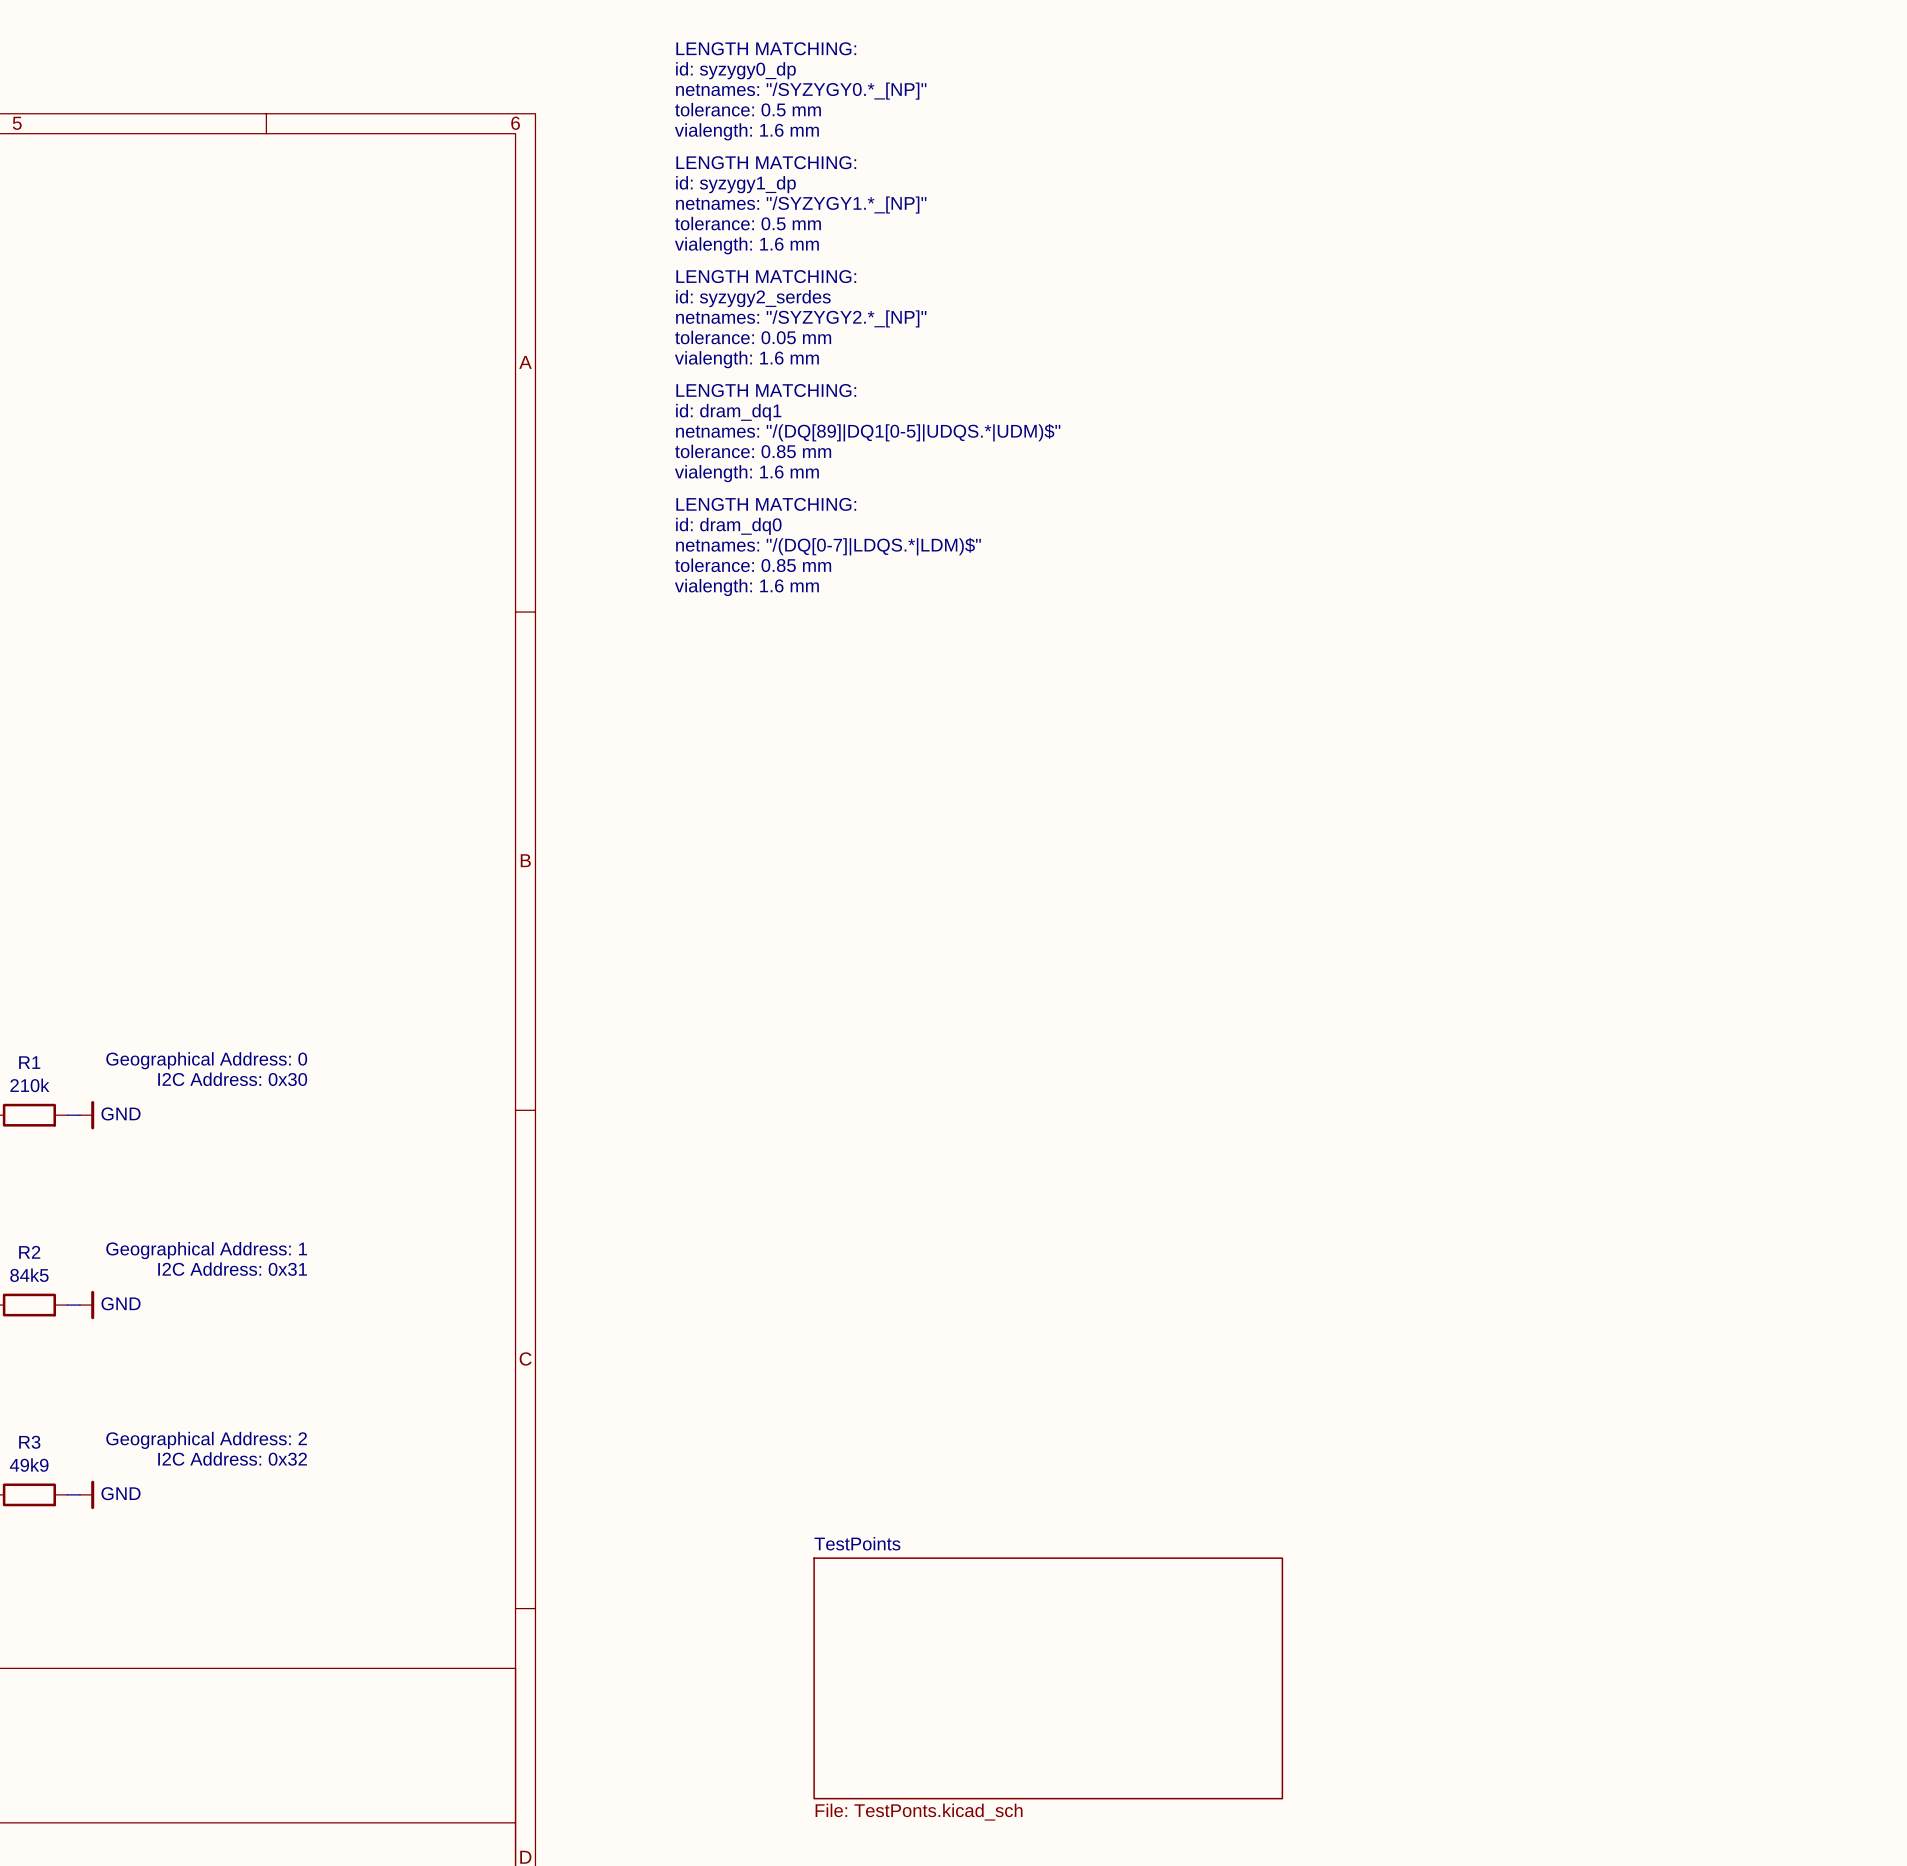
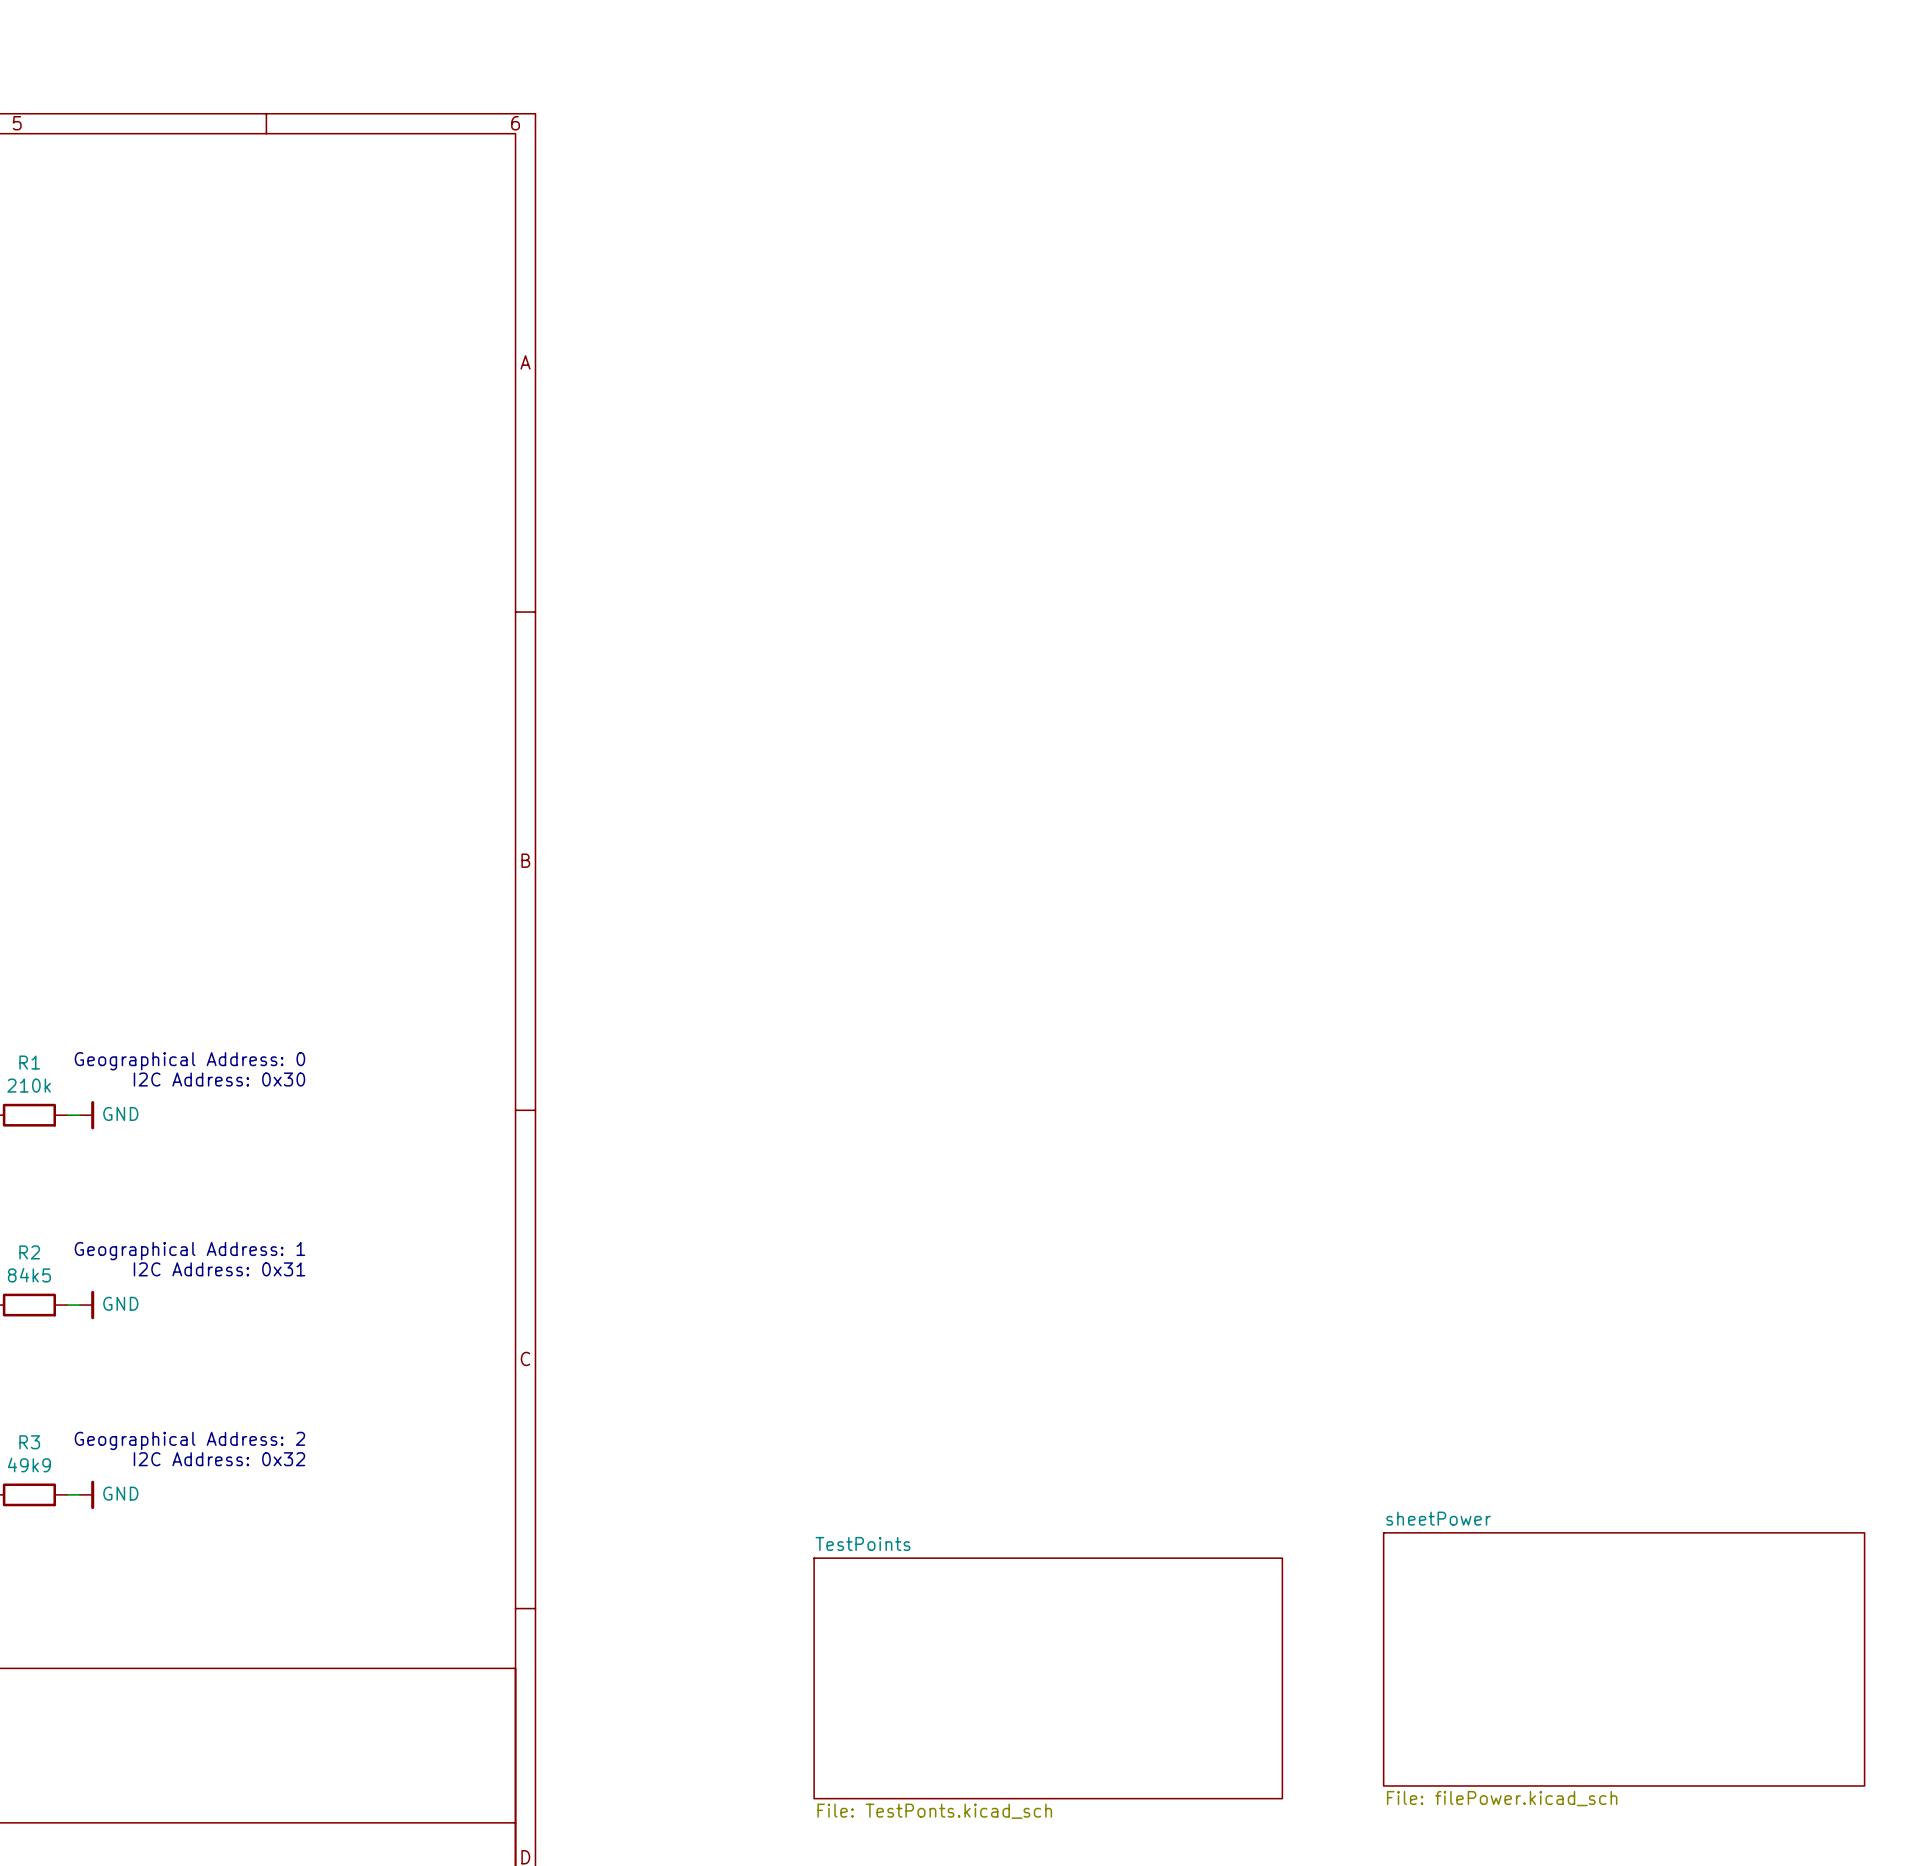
text: LENGTH MATCHING: (766, 48) -> none
text: id: syzygy0_dp (735, 70) -> none
text: netnames: "/SYZYGY0.*_[NP]" (801, 91) -> none
text: tolerance: 0.5 mm (748, 109) -> none
text: vialength: 1.6 mm (746, 131) -> none
text: LENGTH MATCHING: (766, 162) -> none
text: id: syzygy1_dp (735, 184) -> none
text: netnames: "/SYZYGY1.*_[NP]" (801, 205) -> none
text: tolerance: 0.5 mm (748, 223) -> none
text: vialength: 1.6 mm (746, 245) -> none
text: LENGTH MATCHING: (766, 276) -> none
text: id: syzygy2_serdes (753, 298) -> none
text: netnames: "/SYZYGY2.*_[NP]" (801, 318) -> none
text: tolerance: 0.05 mm (753, 337) -> none
text: vialength: 1.6 mm (746, 359) -> none
text: LENGTH MATCHING: (766, 390) -> none
text: id: dram_dq1 (728, 412) -> none
text: netnames: "/(DQ[89]|DQ1[0-5]|UDQS.*|UDM)$" (868, 432) -> none
text: tolerance: 0.85 mm (753, 451) -> none
text: vialength: 1.6 mm (746, 473) -> none
text: LENGTH MATCHING: (766, 504) -> none
text: id: dram_dq0 (728, 526) -> none
text: netnames: "/(DQ[0-7]|LDQS.*|LDM)$" (828, 546) -> none
text: tolerance: 0.85 mm (753, 565) -> none
text: vialength: 1.6 mm (746, 587) -> none
sheet sheetPower: none -> File: filePower.kicad_sch (1624, 1659)

